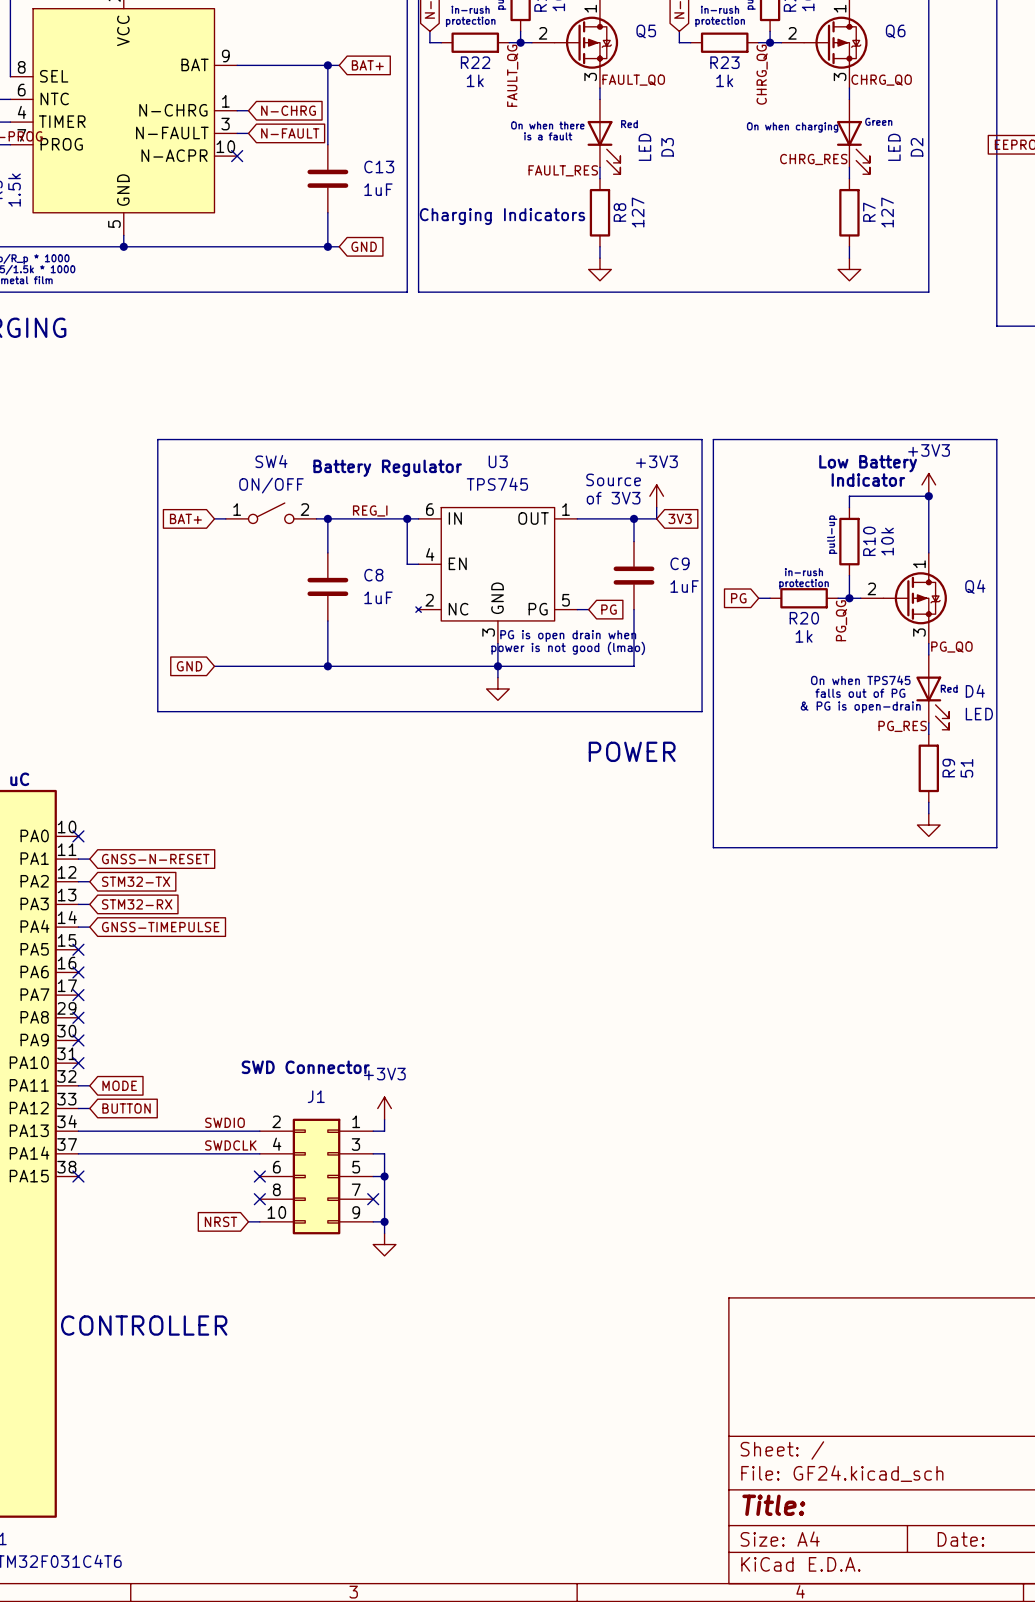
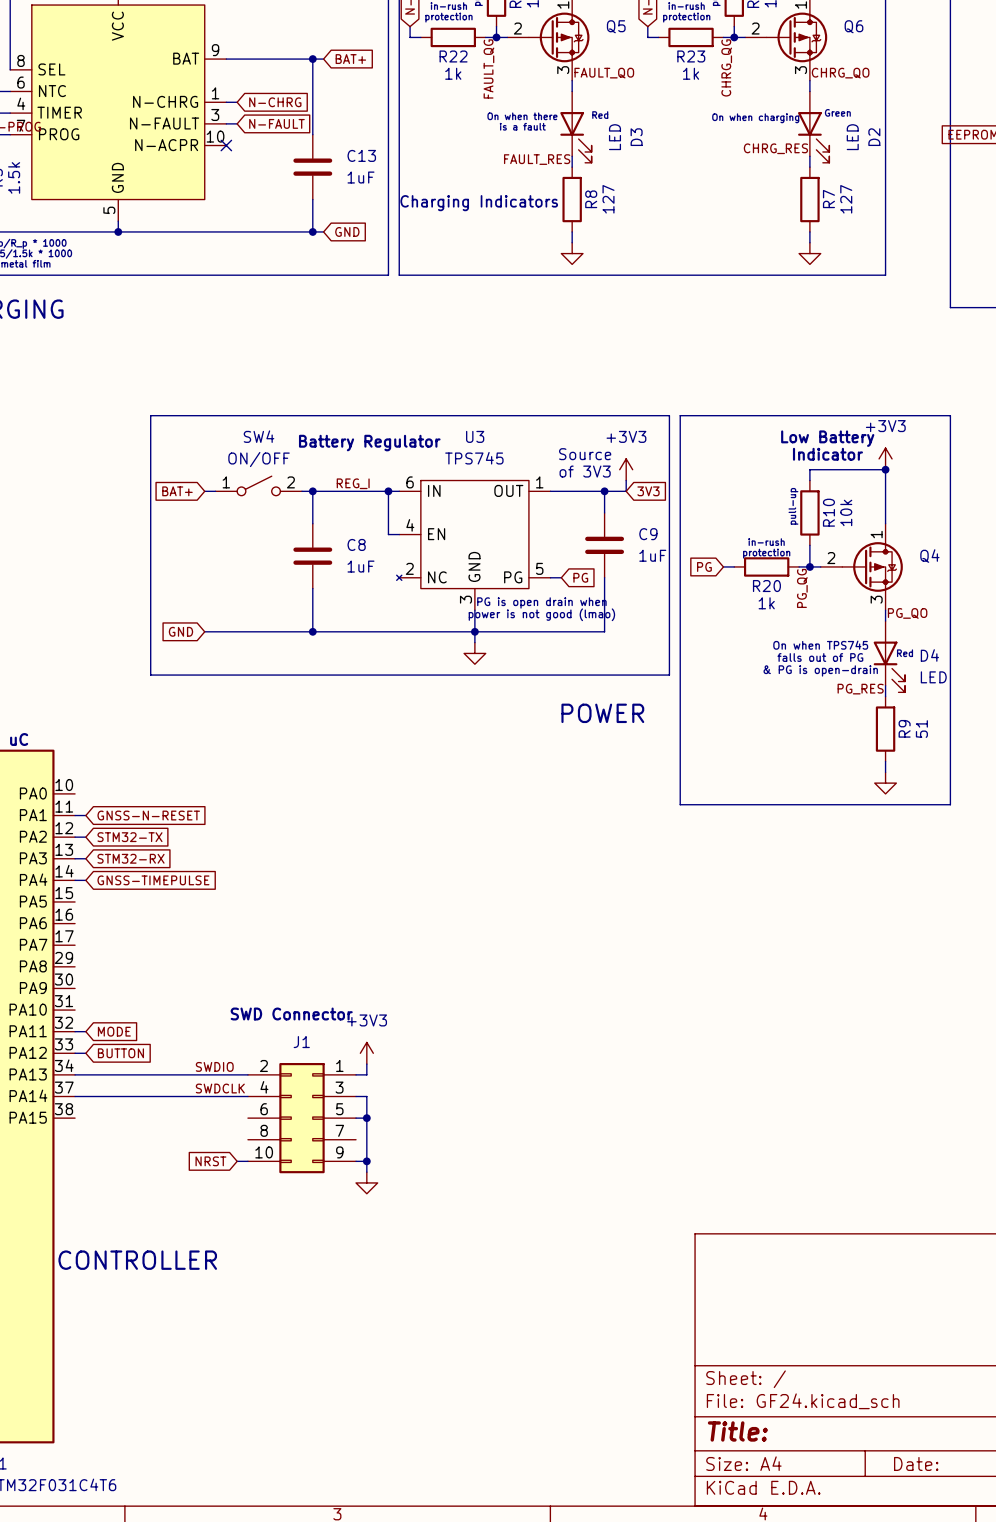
no-connect mark: (78, 836) -> none
no-connect mark: (78, 949) -> none
no-connect mark: (78, 972) -> none
no-connect mark: (78, 995) -> none
no-connect mark: (78, 1017) -> none
no-connect mark: (78, 1040) -> none
no-connect mark: (78, 1063) -> none
no-connect mark: (78, 1176) -> none
no-connect mark: (259, 1176) -> none
no-connect mark: (259, 1199) -> none
no-connect mark: (373, 1199) -> none

